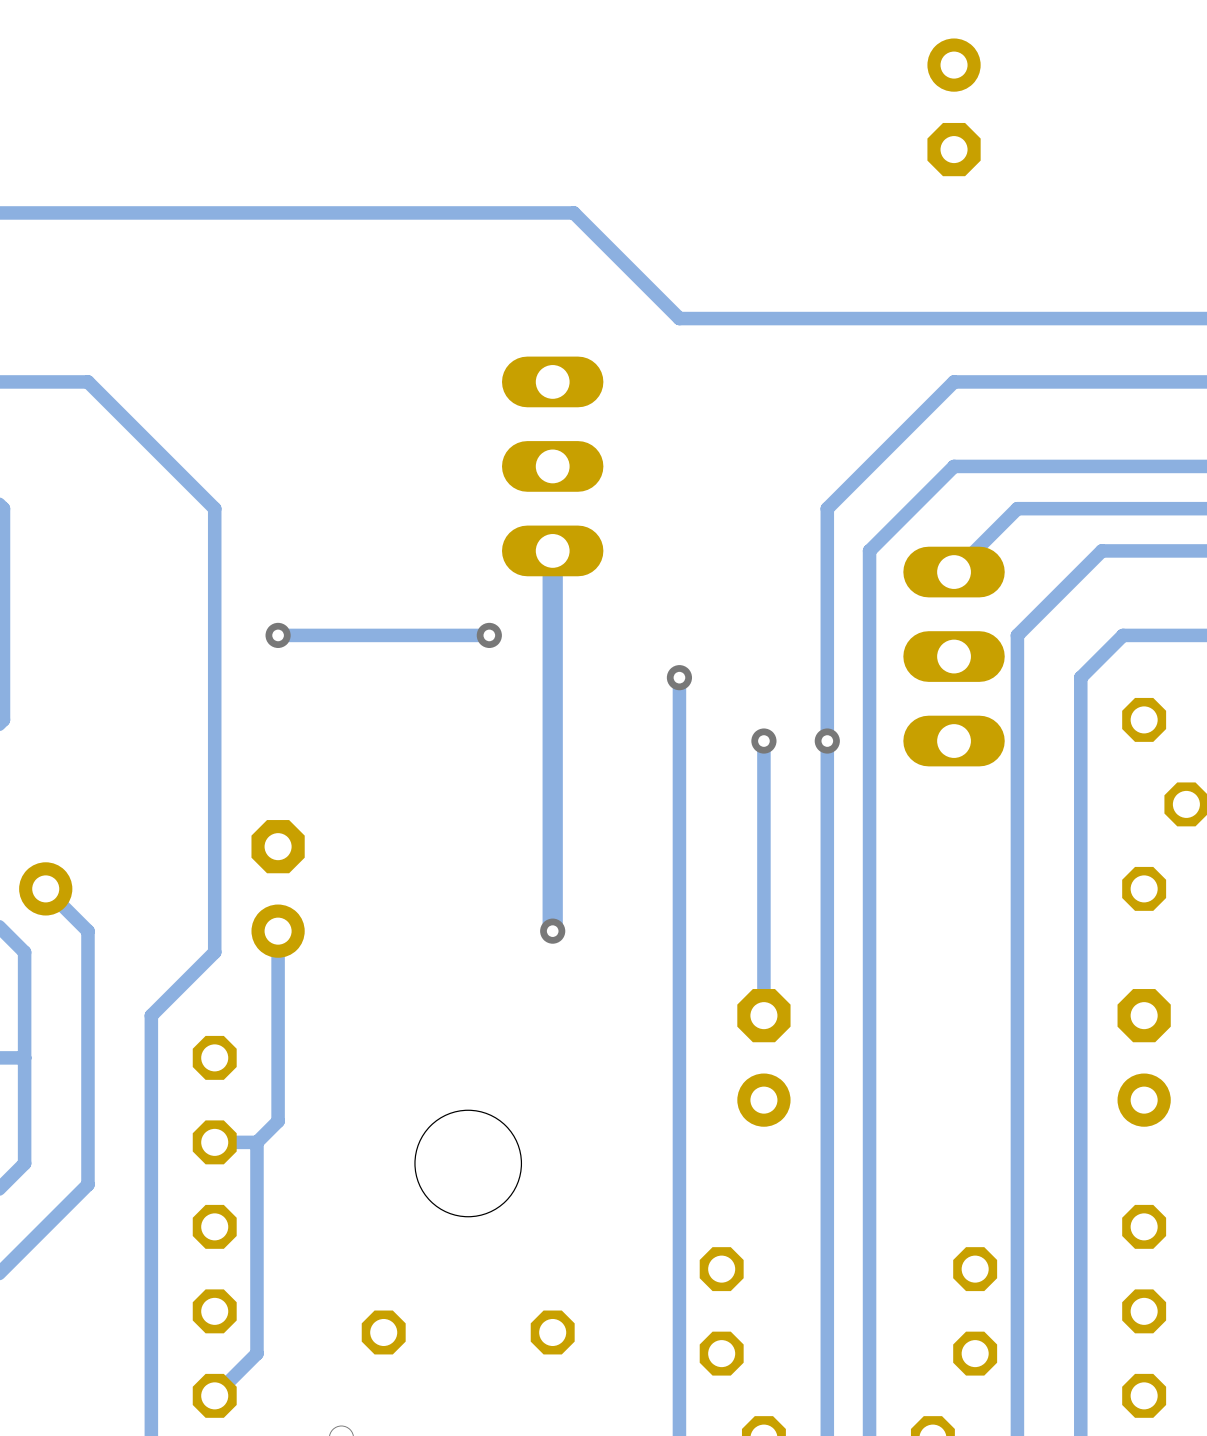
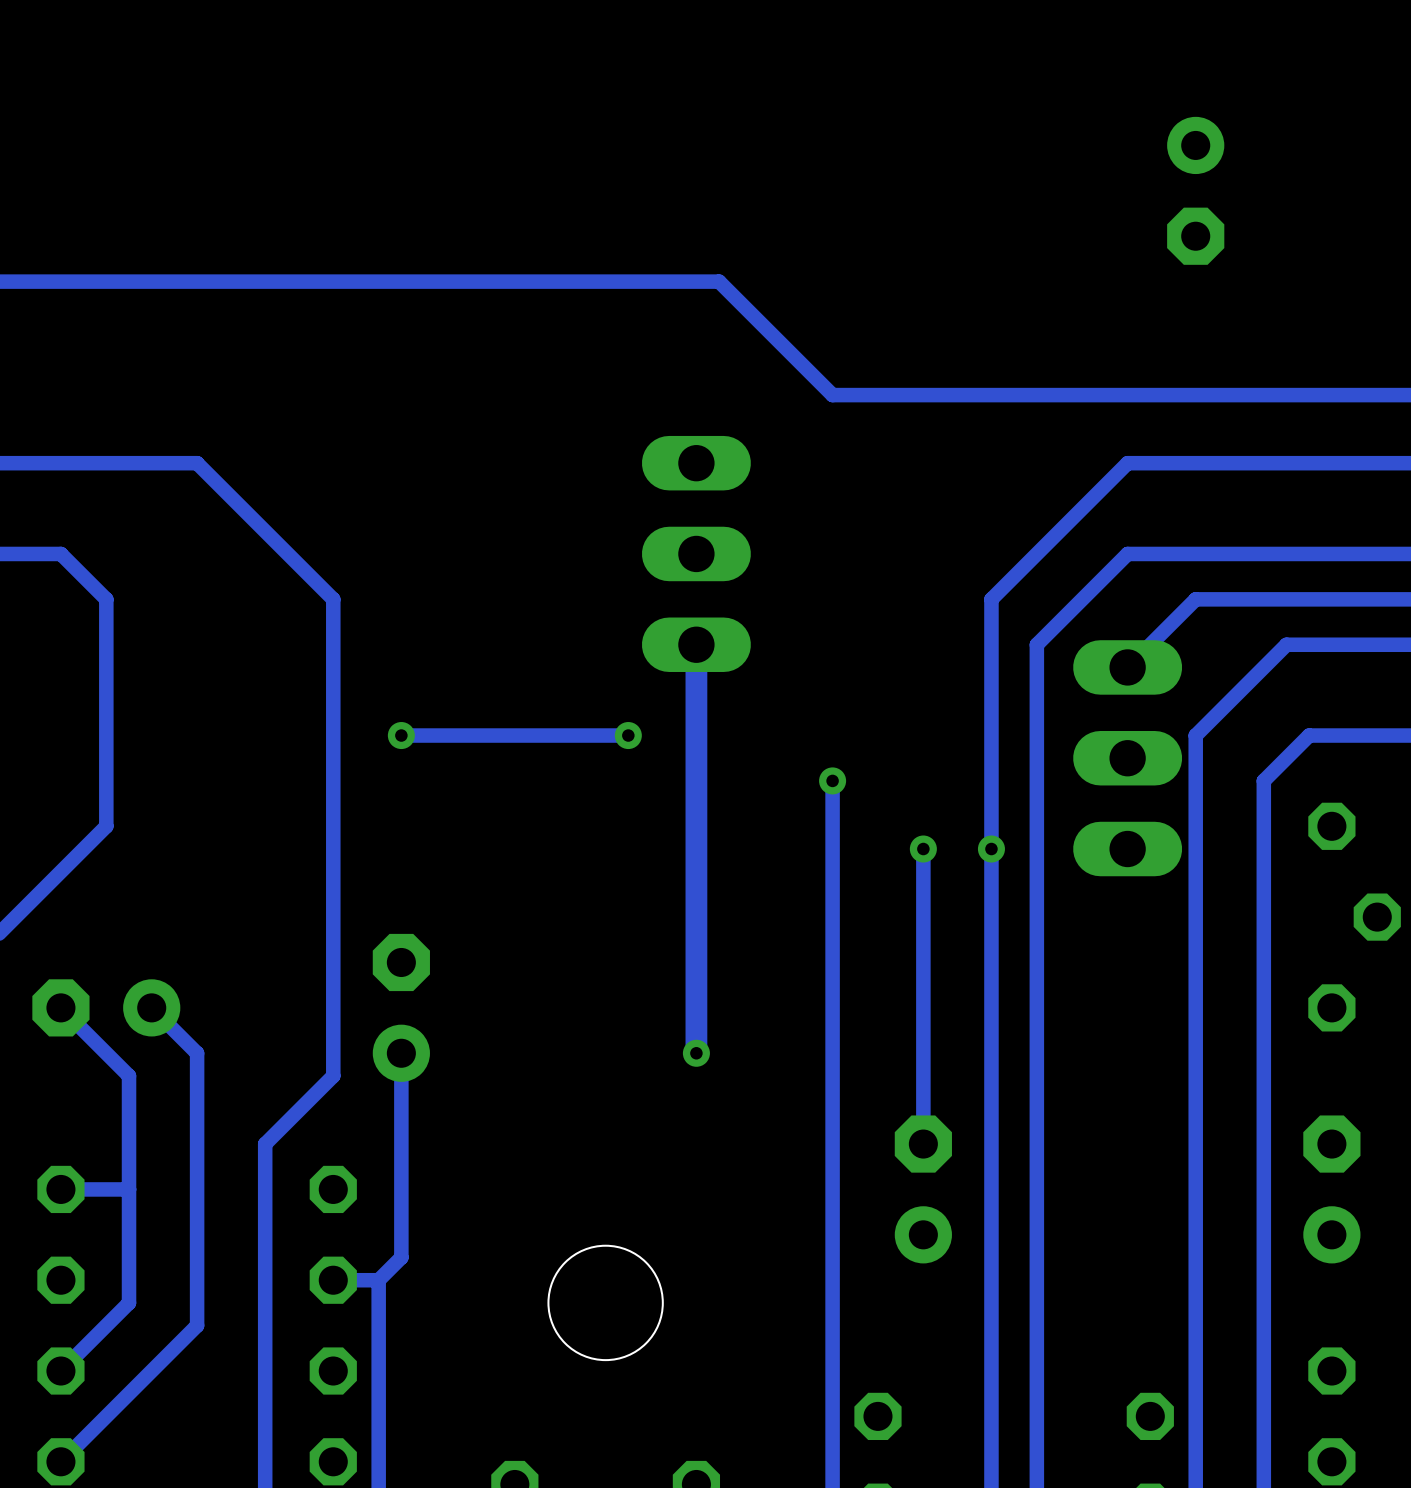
part position: (954, 107) -> (1195, 190)

